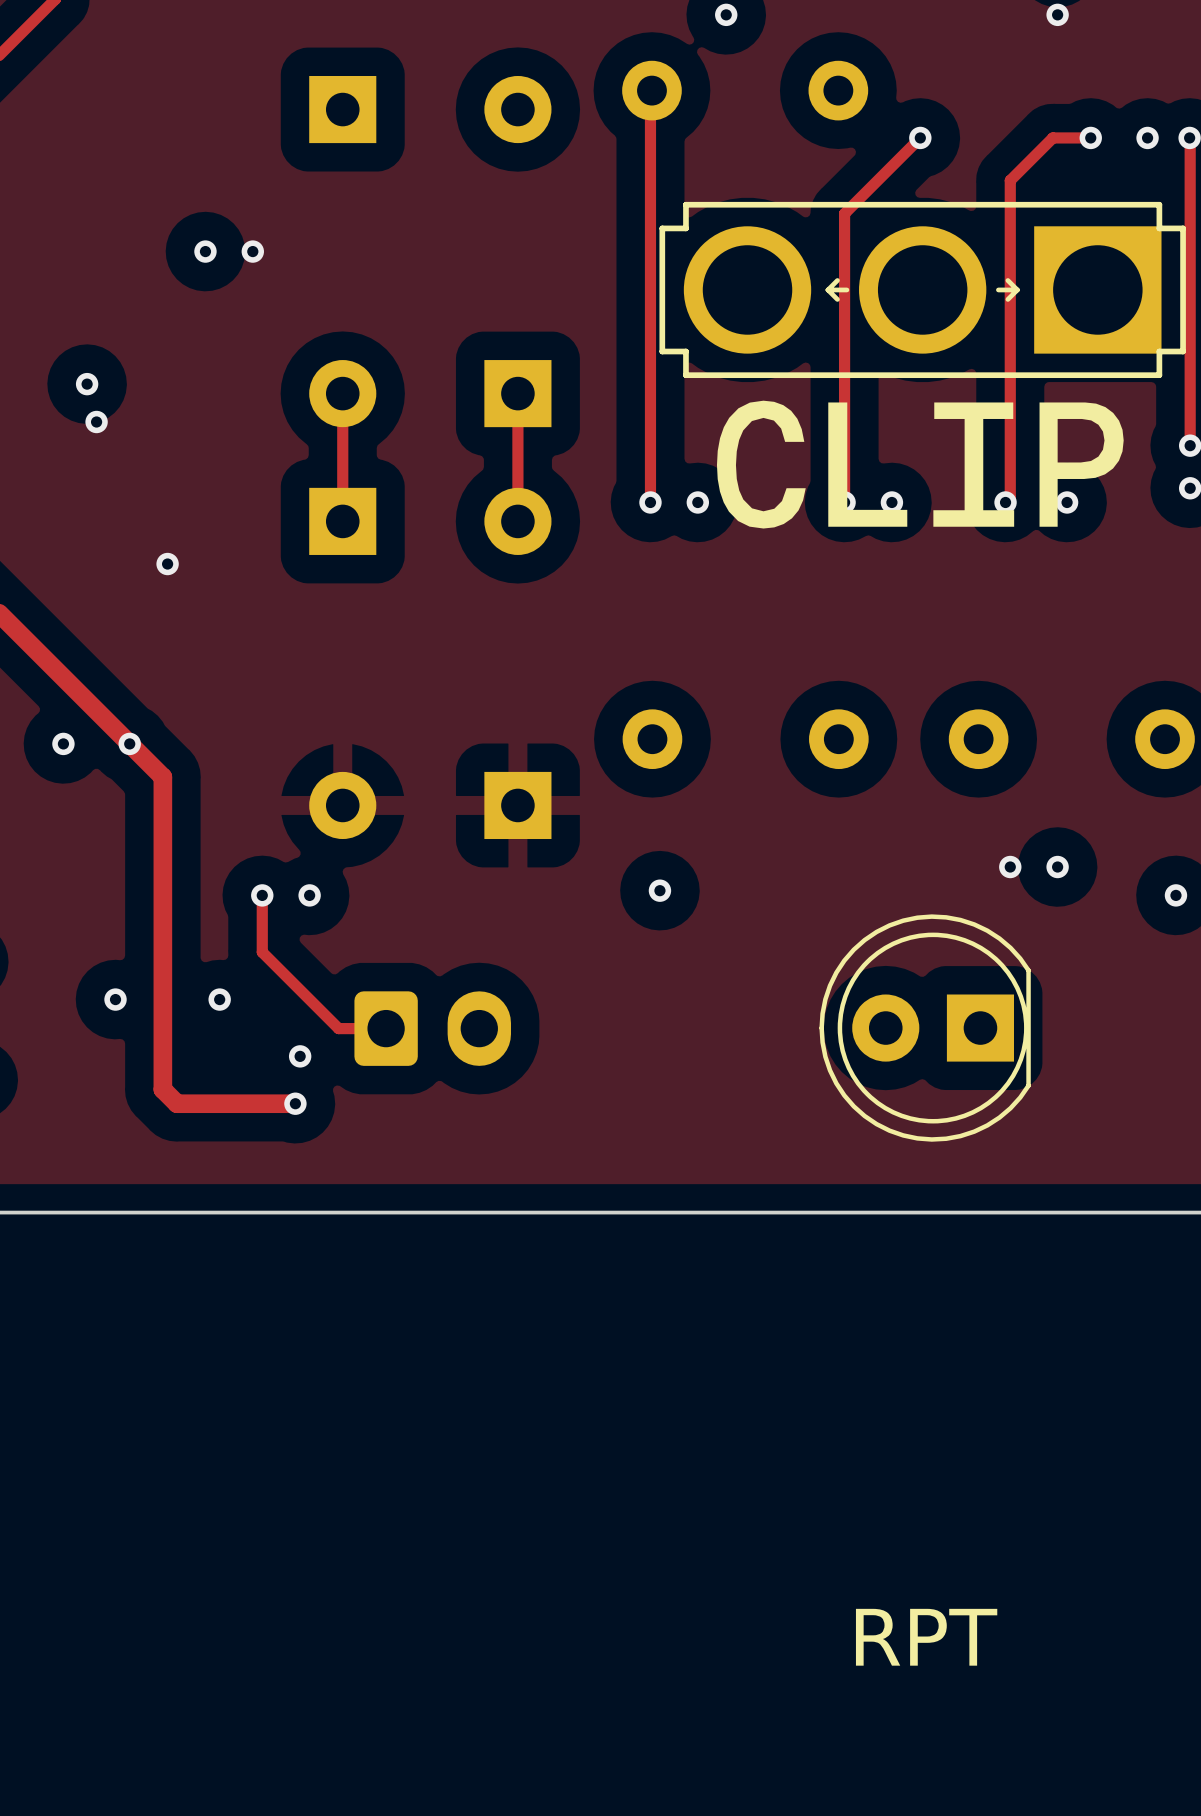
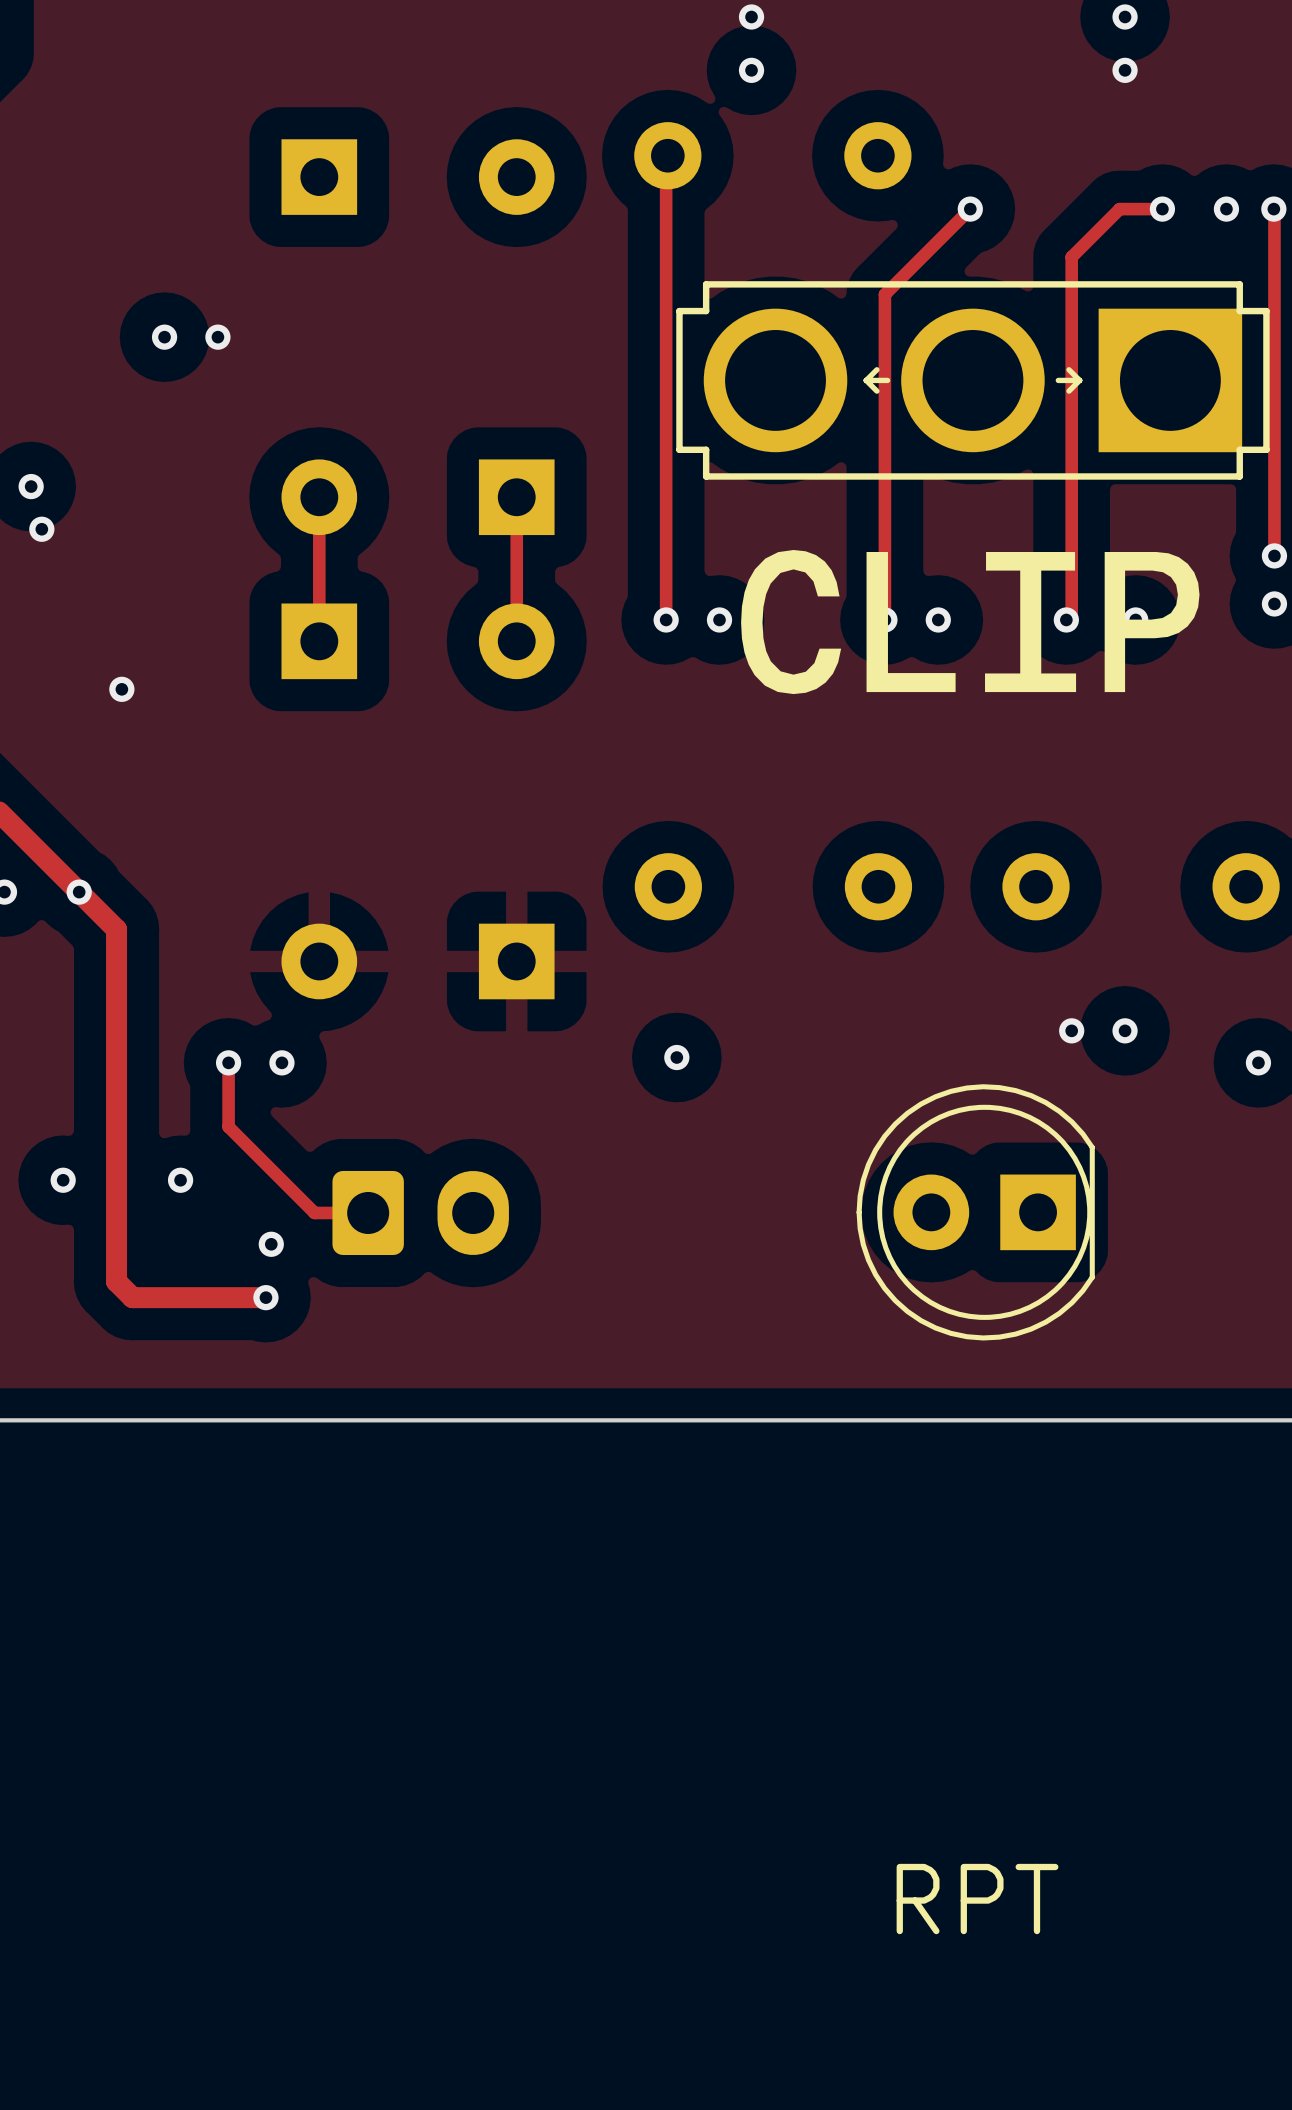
drawing position: (920, 464) -> (970, 622)

